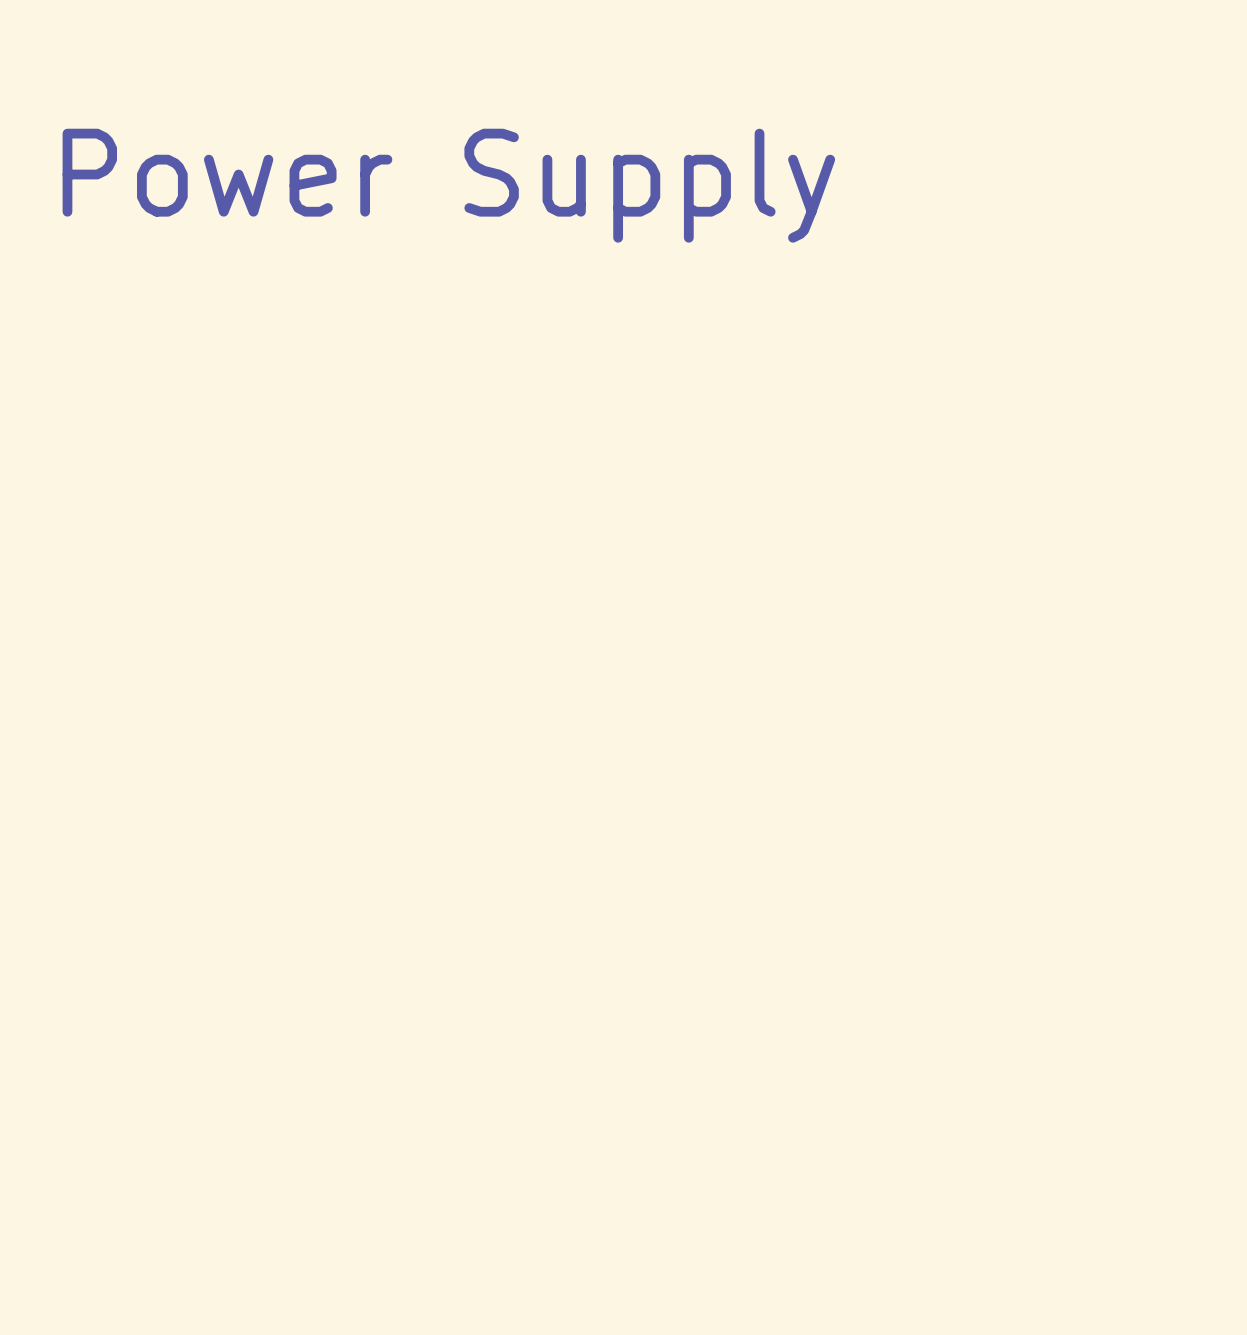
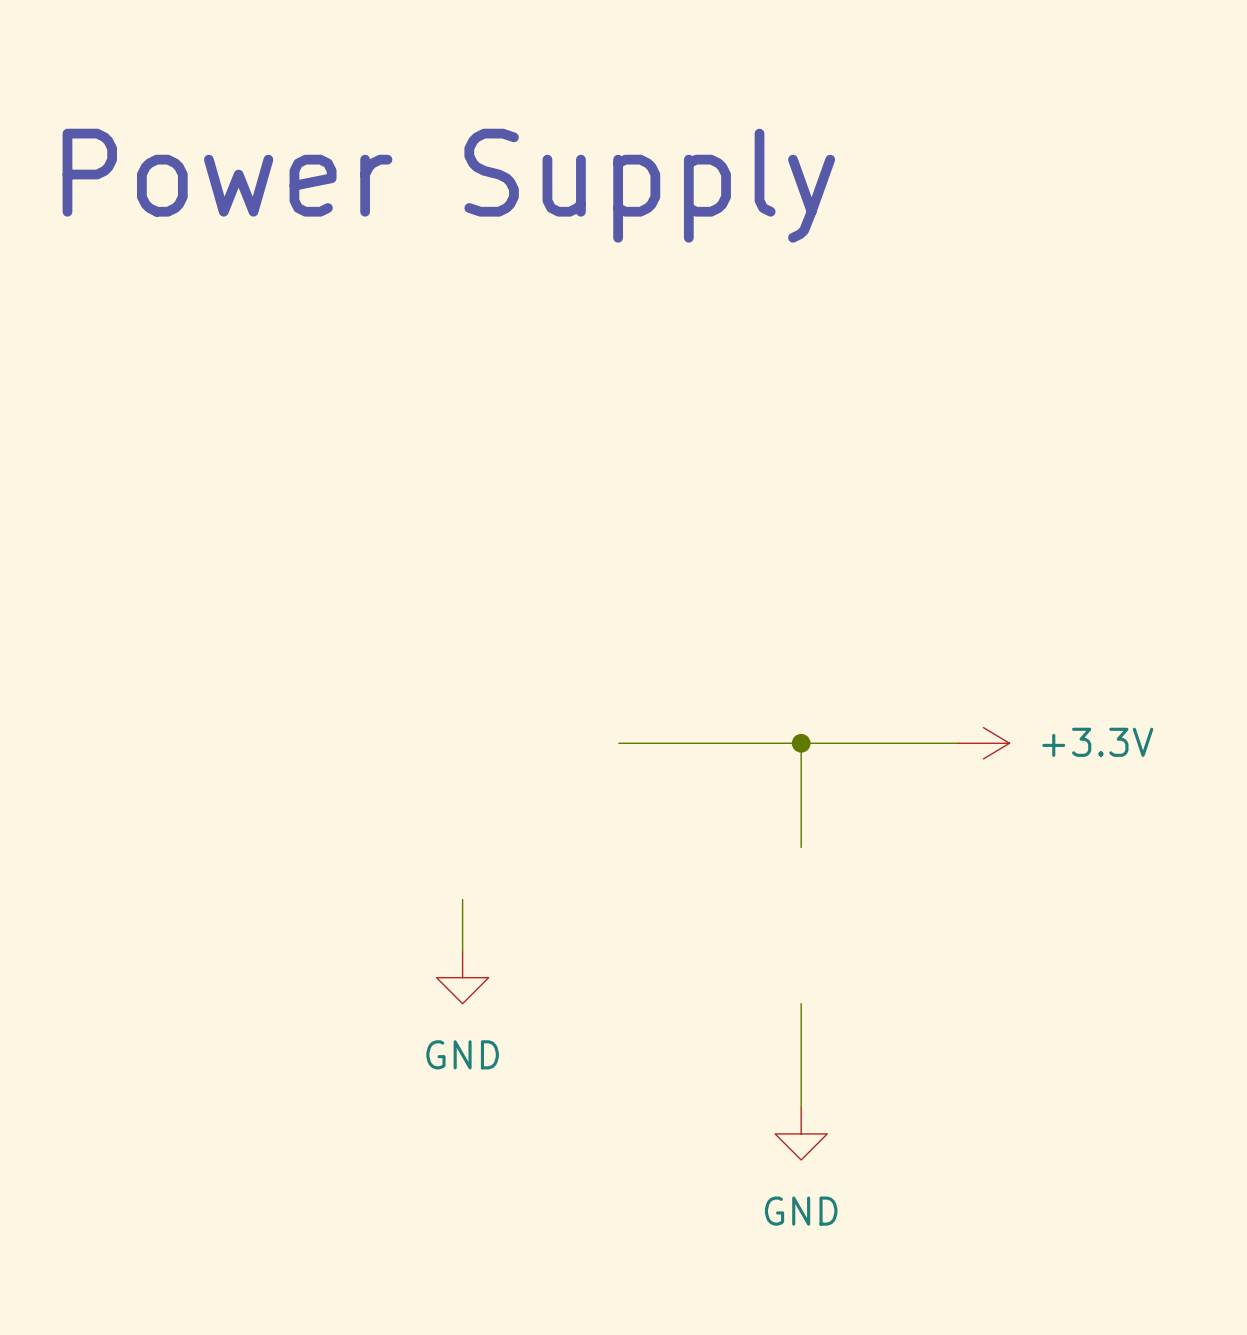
wire: none -> (618, 743) (957, 743)
wire: none -> (801, 743) (801, 847)
junction: none -> (801, 743)
power symbol: none -> +3.3V (983, 743)
wire: none -> (462, 899) (462, 951)
power symbol: none -> GND (462, 977)
wire: none -> (801, 1003) (801, 1107)
power symbol: none -> GND (801, 1133)

